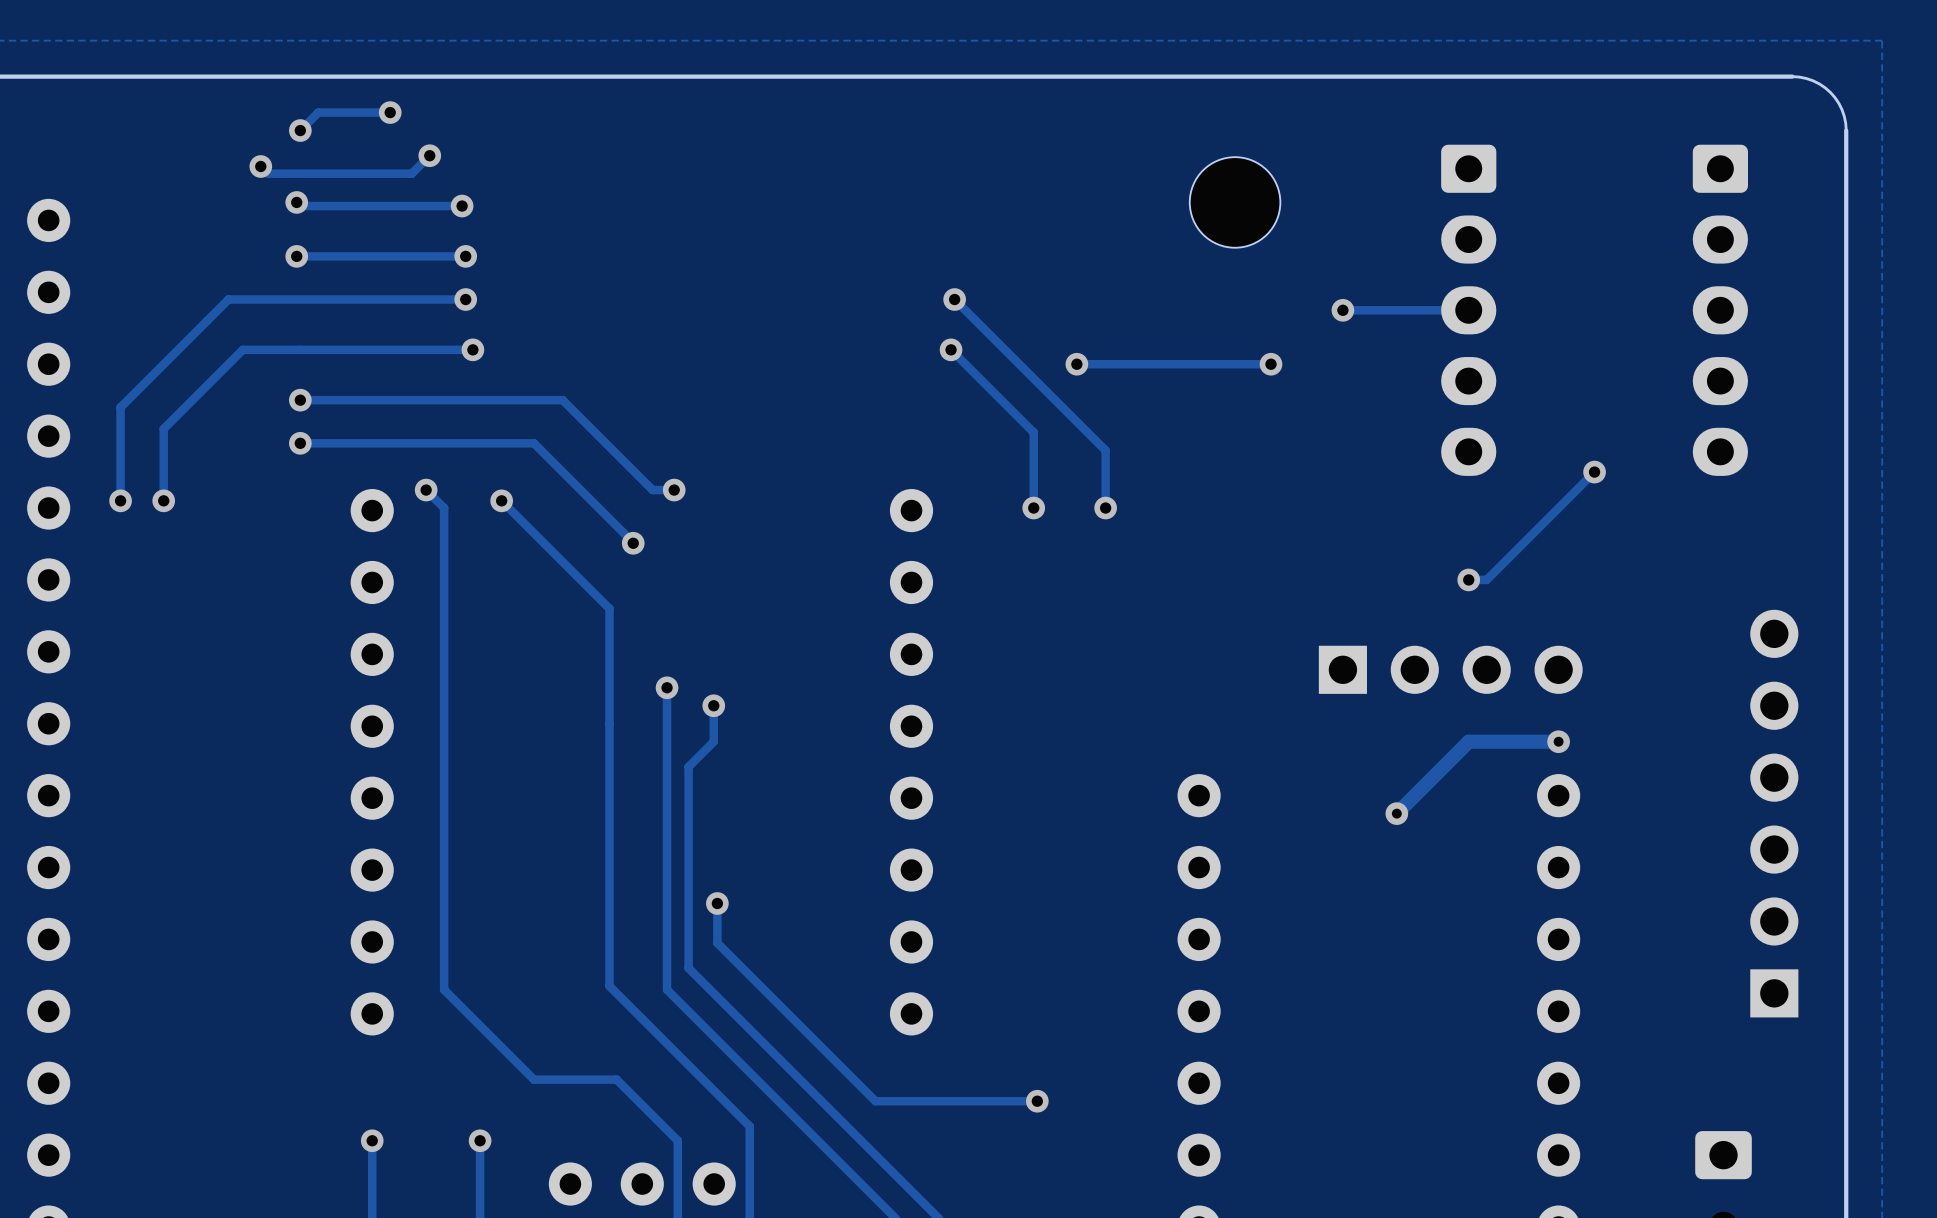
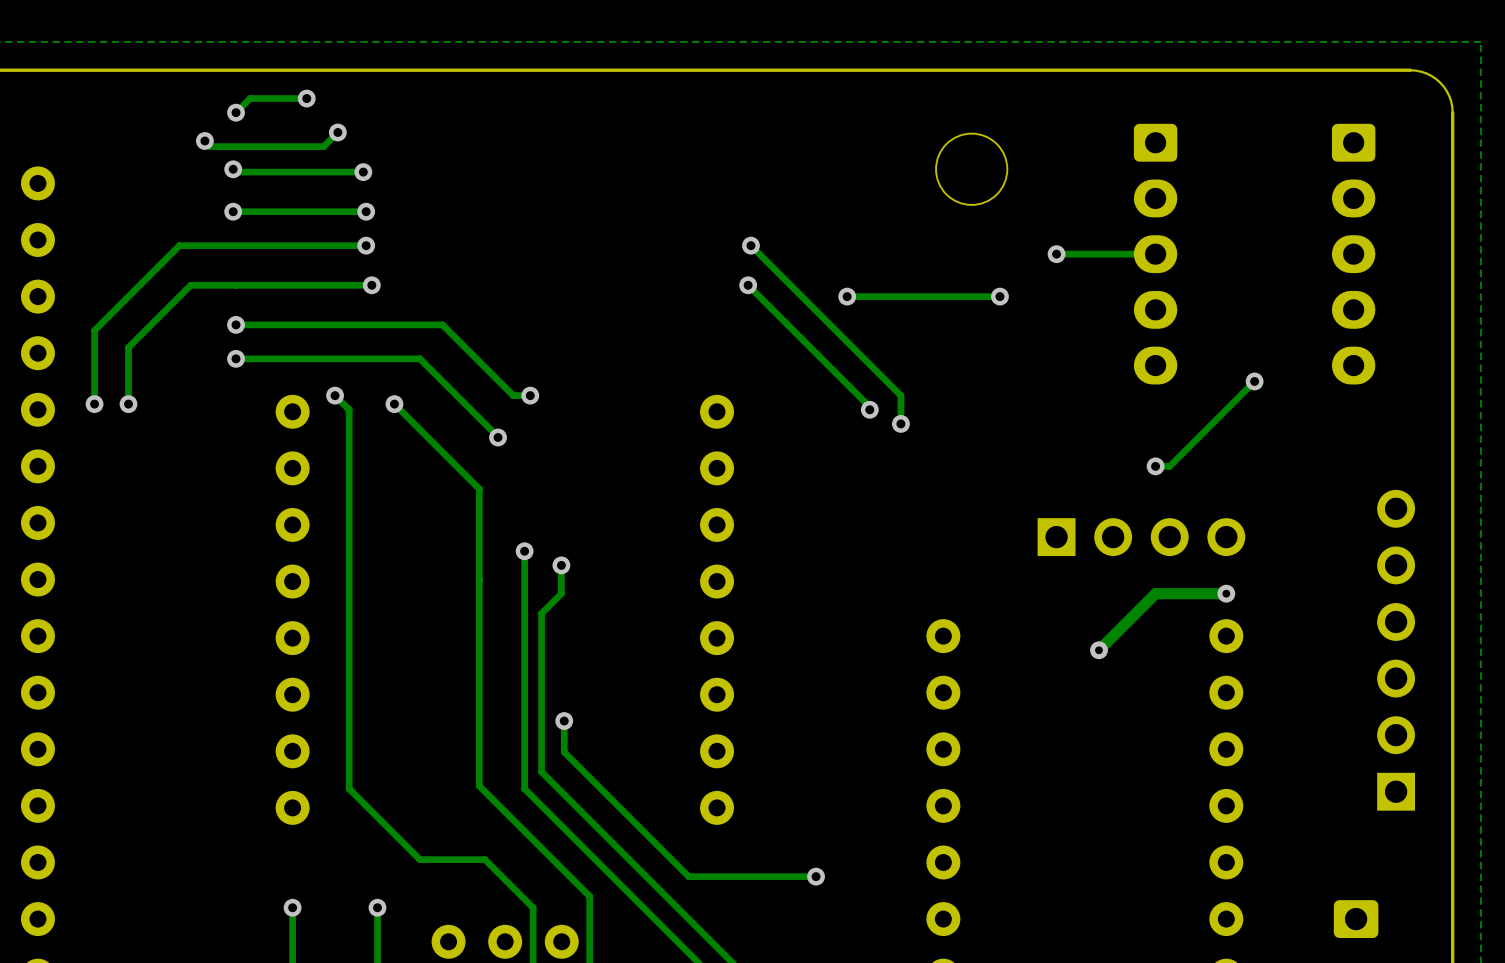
track: (1033, 432) (1033, 508) -> (813, 350) (872, 409)
track: (1105, 450) (1105, 508) -> (869, 364) (900, 395) (900, 423)
via position: (1033, 508) -> (900, 423)

